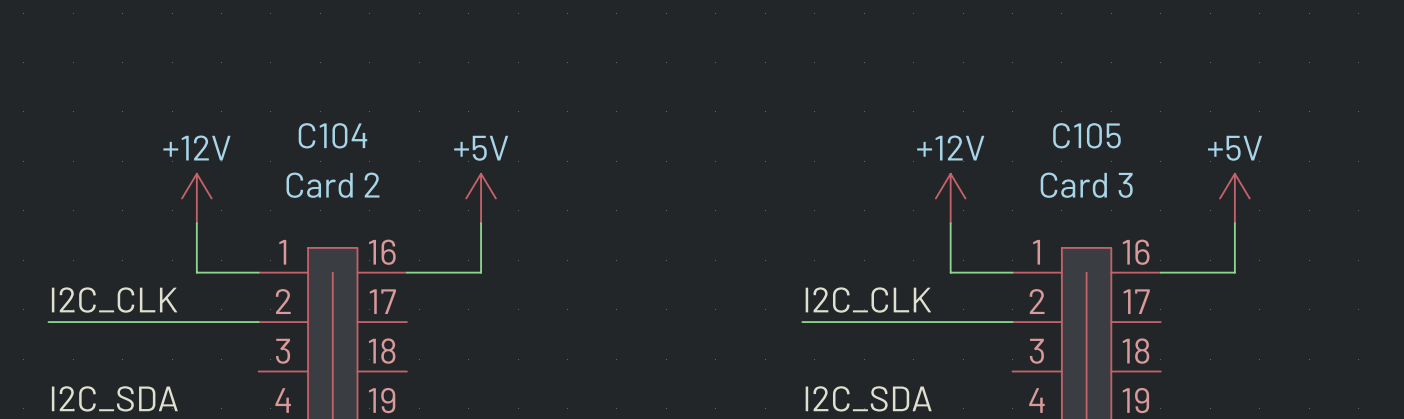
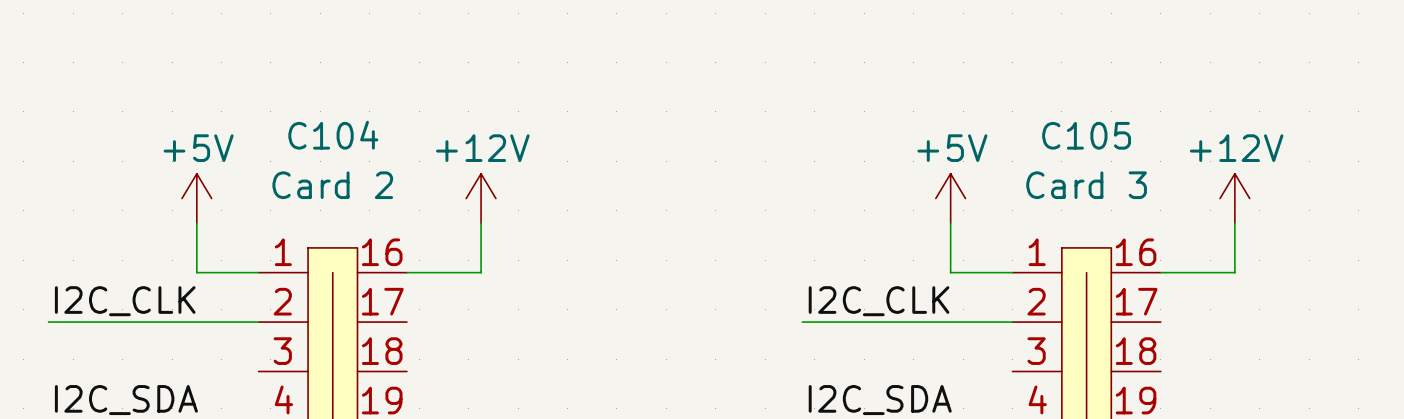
power symbol: +12V (196, 198) -> +5V (196, 198)
power symbol: +5V (481, 198) -> +12V (481, 198)
power symbol: +12V (950, 198) -> +5V (950, 198)
power symbol: +5V (1234, 198) -> +12V (1234, 198)

